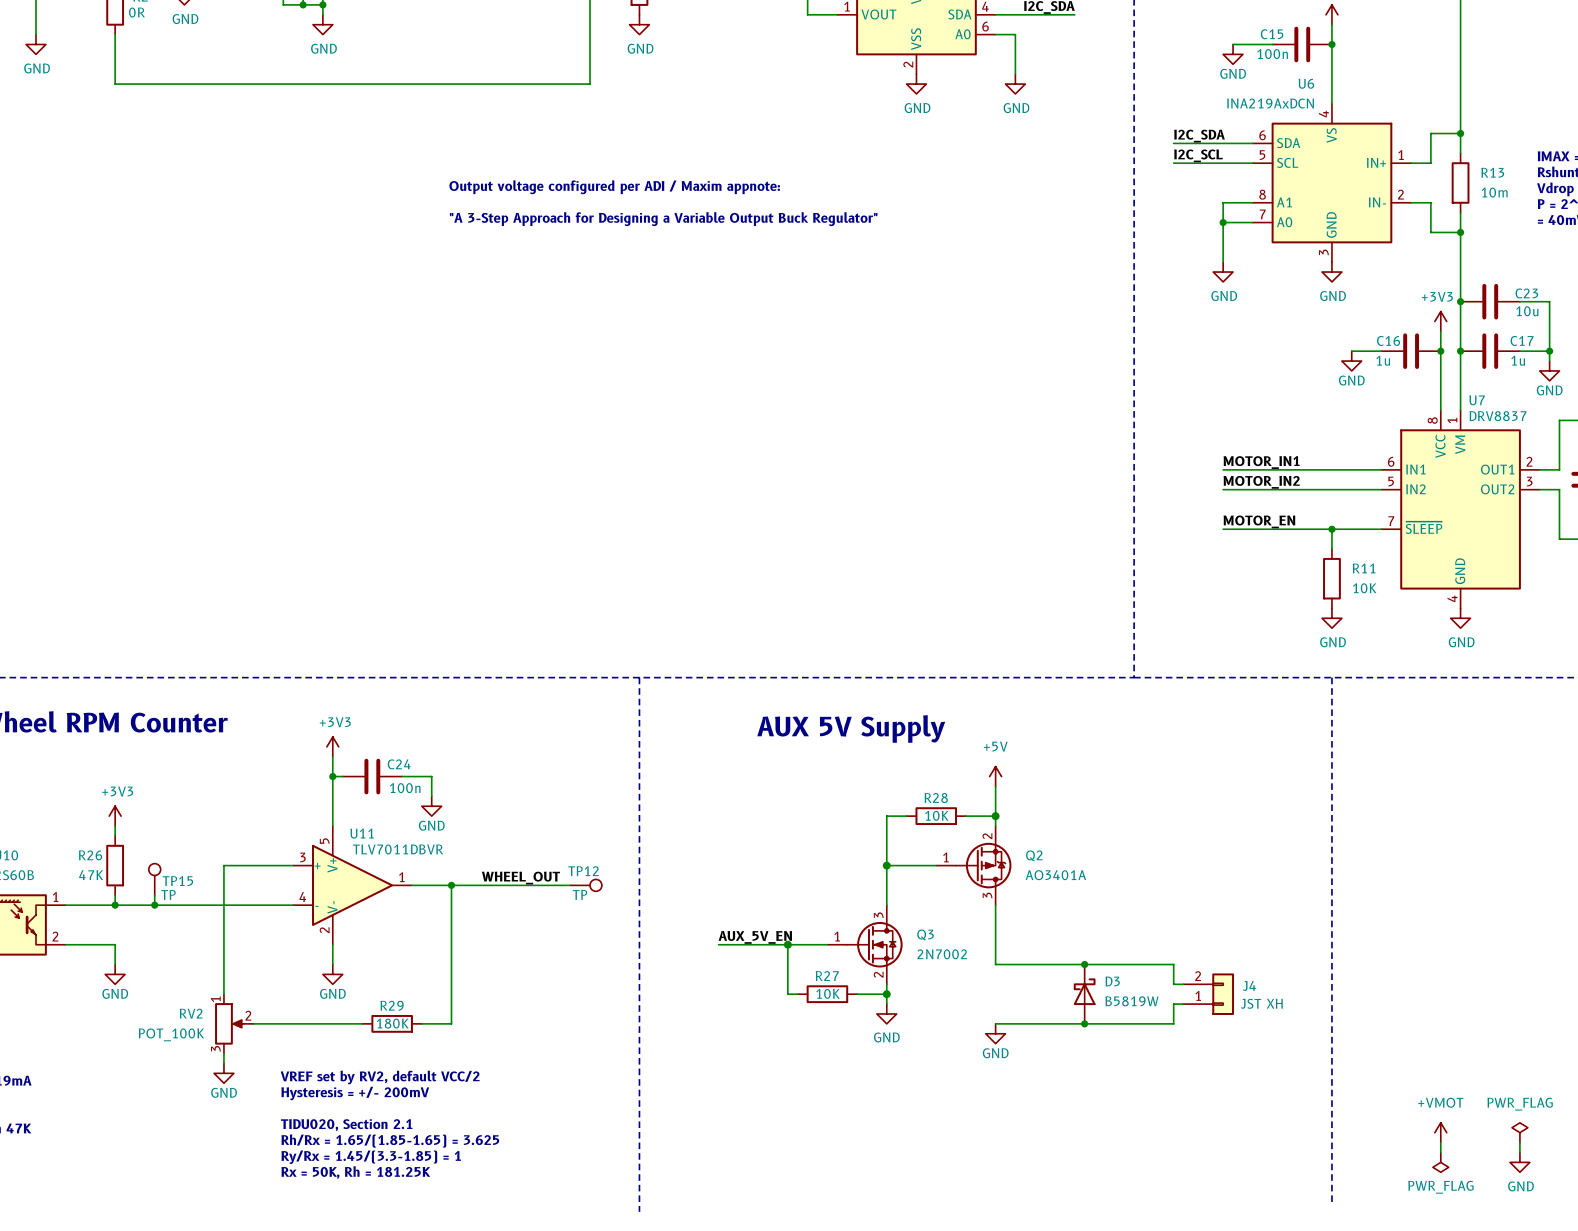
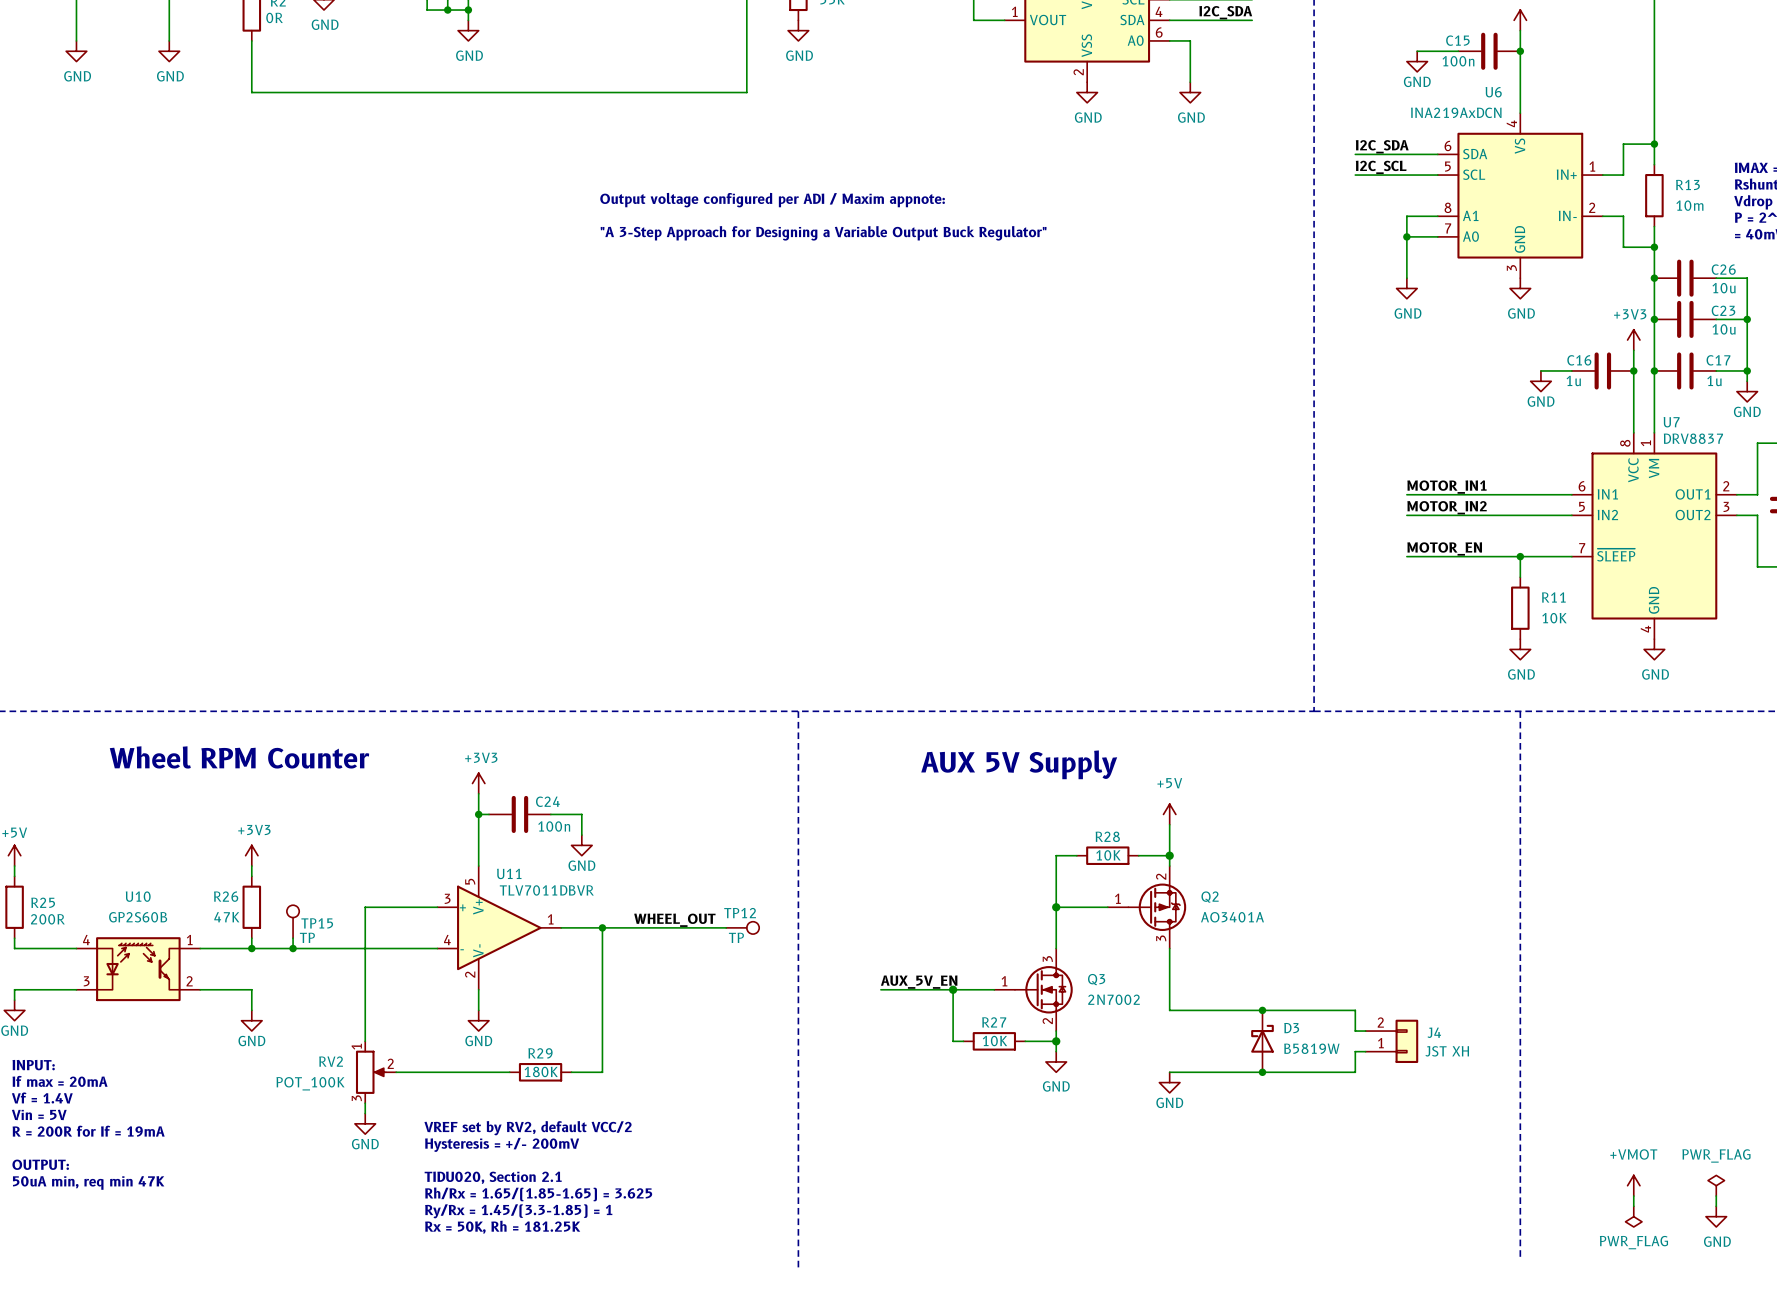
junction: none -> (1654, 278)
C26: none -> 10u (1685, 278)
wire: none -> (1716, 278) (1747, 278) (1747, 319)
junction: none -> (1747, 319)

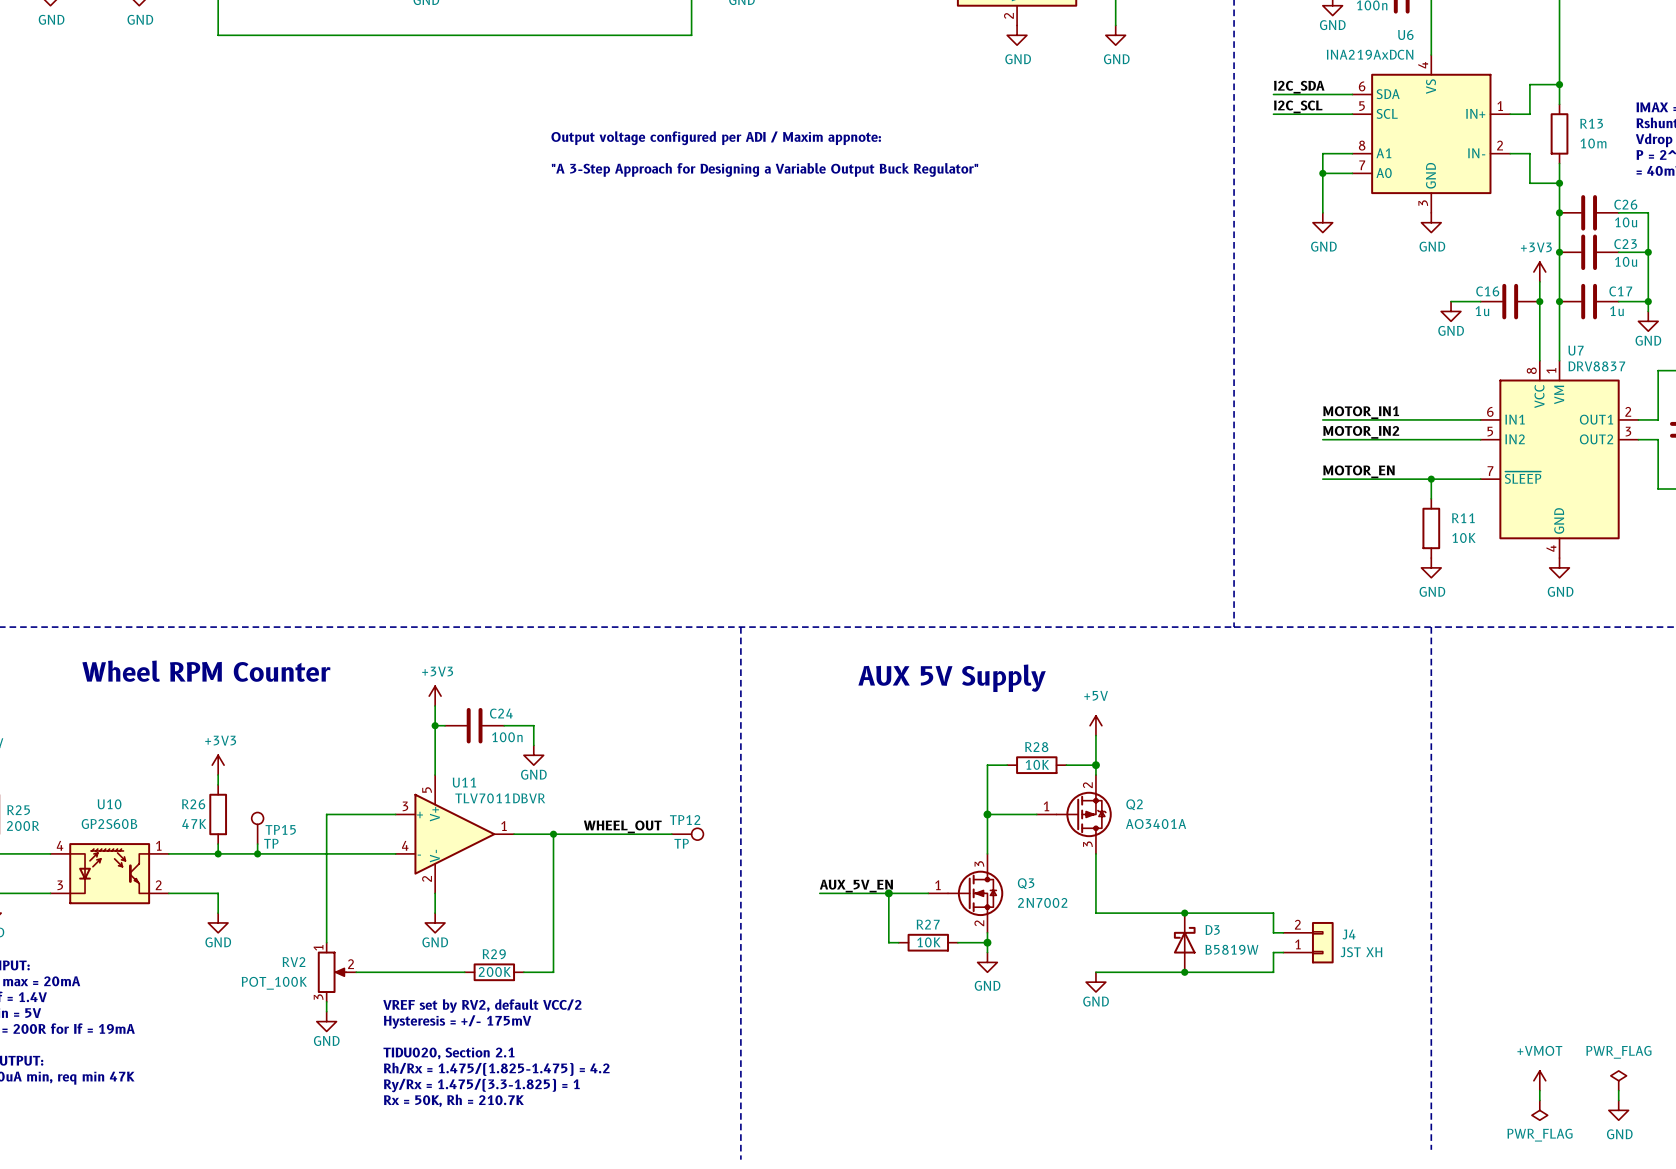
R29 value: 180K (541, 1071) -> 200K (494, 971)
text: none -> VREF set by RV2, default VCC/2 (482, 1006)
text: VREF set by RV2, default VCC/2 (528, 1128) -> Hysteresis = +/- 175mV (457, 1022)
text: Hysteresis = +/- 200mV (502, 1144) -> none
text: none -> TIDU020, Section 2.1 (448, 1053)
text: TIDU020, Section 2.1 (493, 1177) -> Rh/Rx = 1.475/(1.825-1.475) = 4.2 (496, 1069)
text: Rh/Rx = 1.65/(1.85-1.65) = 3.625 (538, 1194) -> Ry/Rx = 1.475/(3.3-1.825) = 1 (481, 1085)
text: Ry/Rx = 1.45/(3.3-1.85) = 1 (518, 1211) -> Rx = 50K, Rh = 210.7K (453, 1100)
text: Rx = 50K, Rh = 181.25K (502, 1227) -> none

